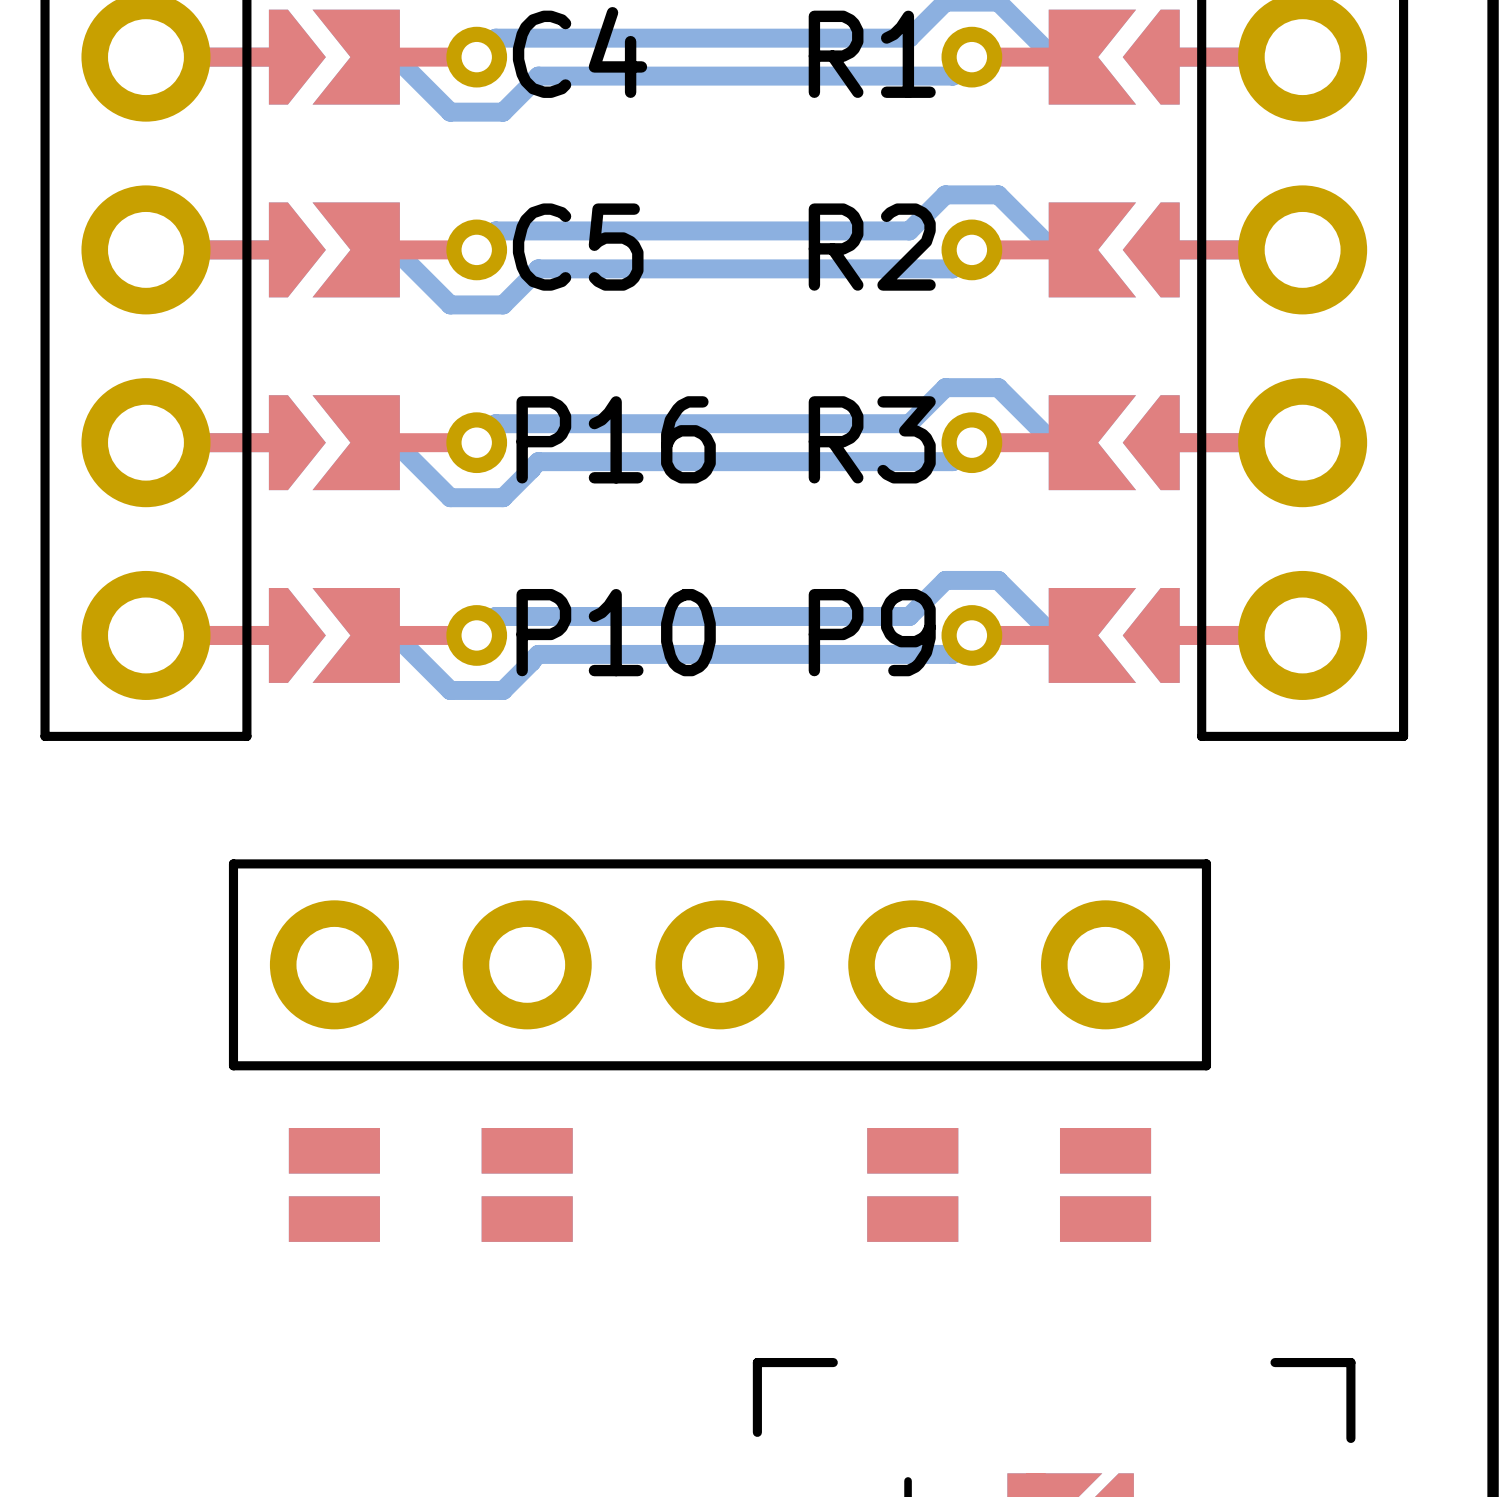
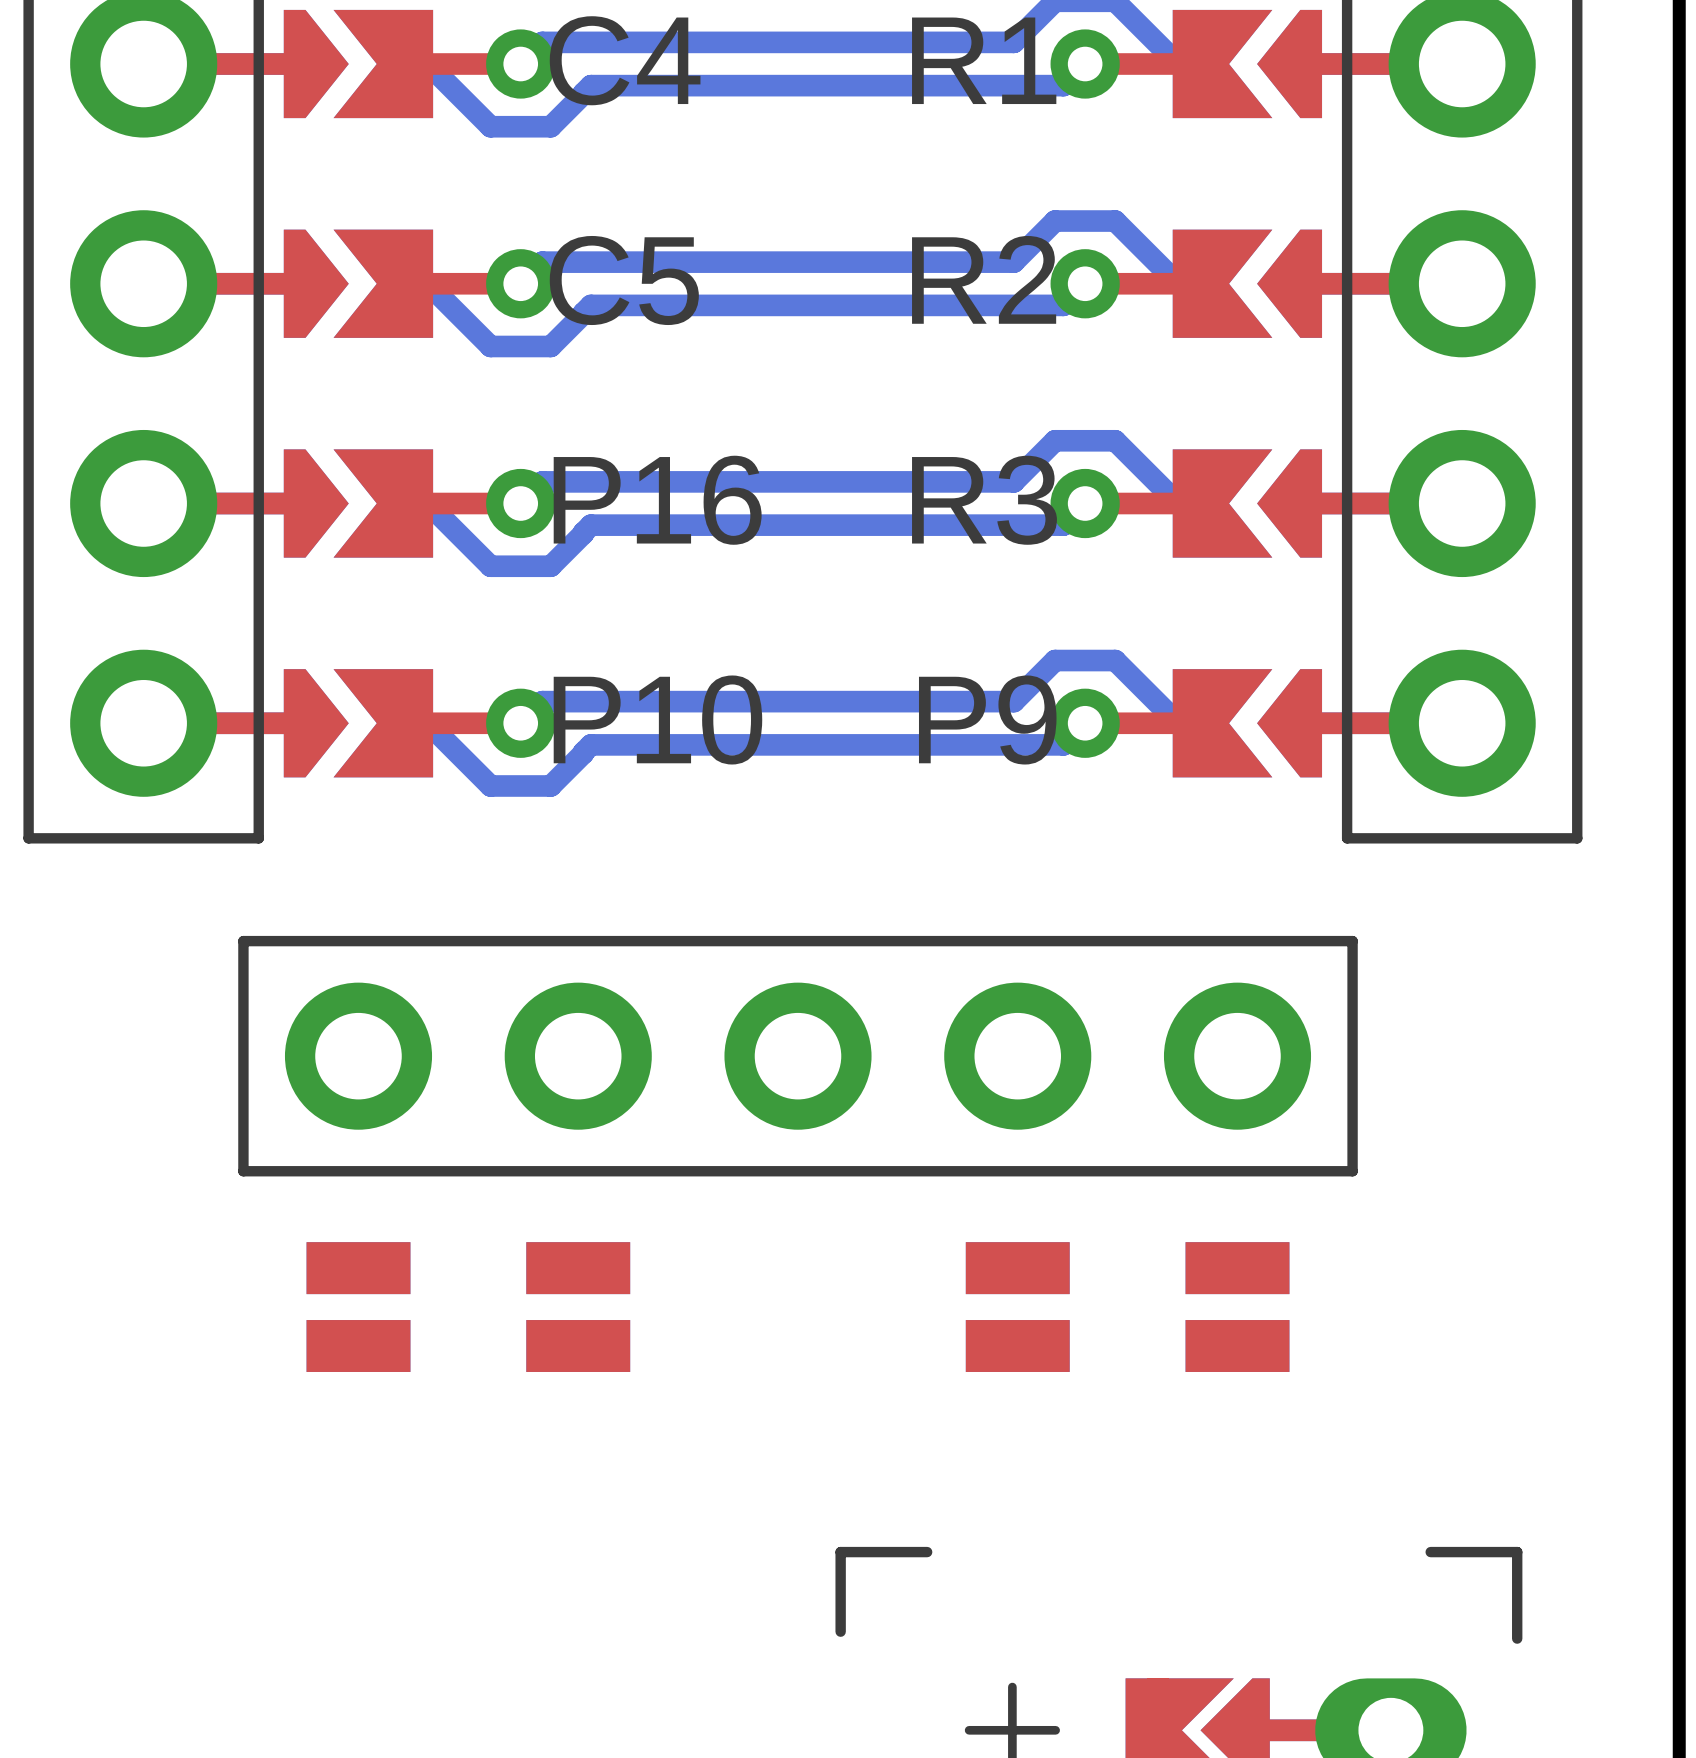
part position: (719, 1050) -> (798, 1153)

